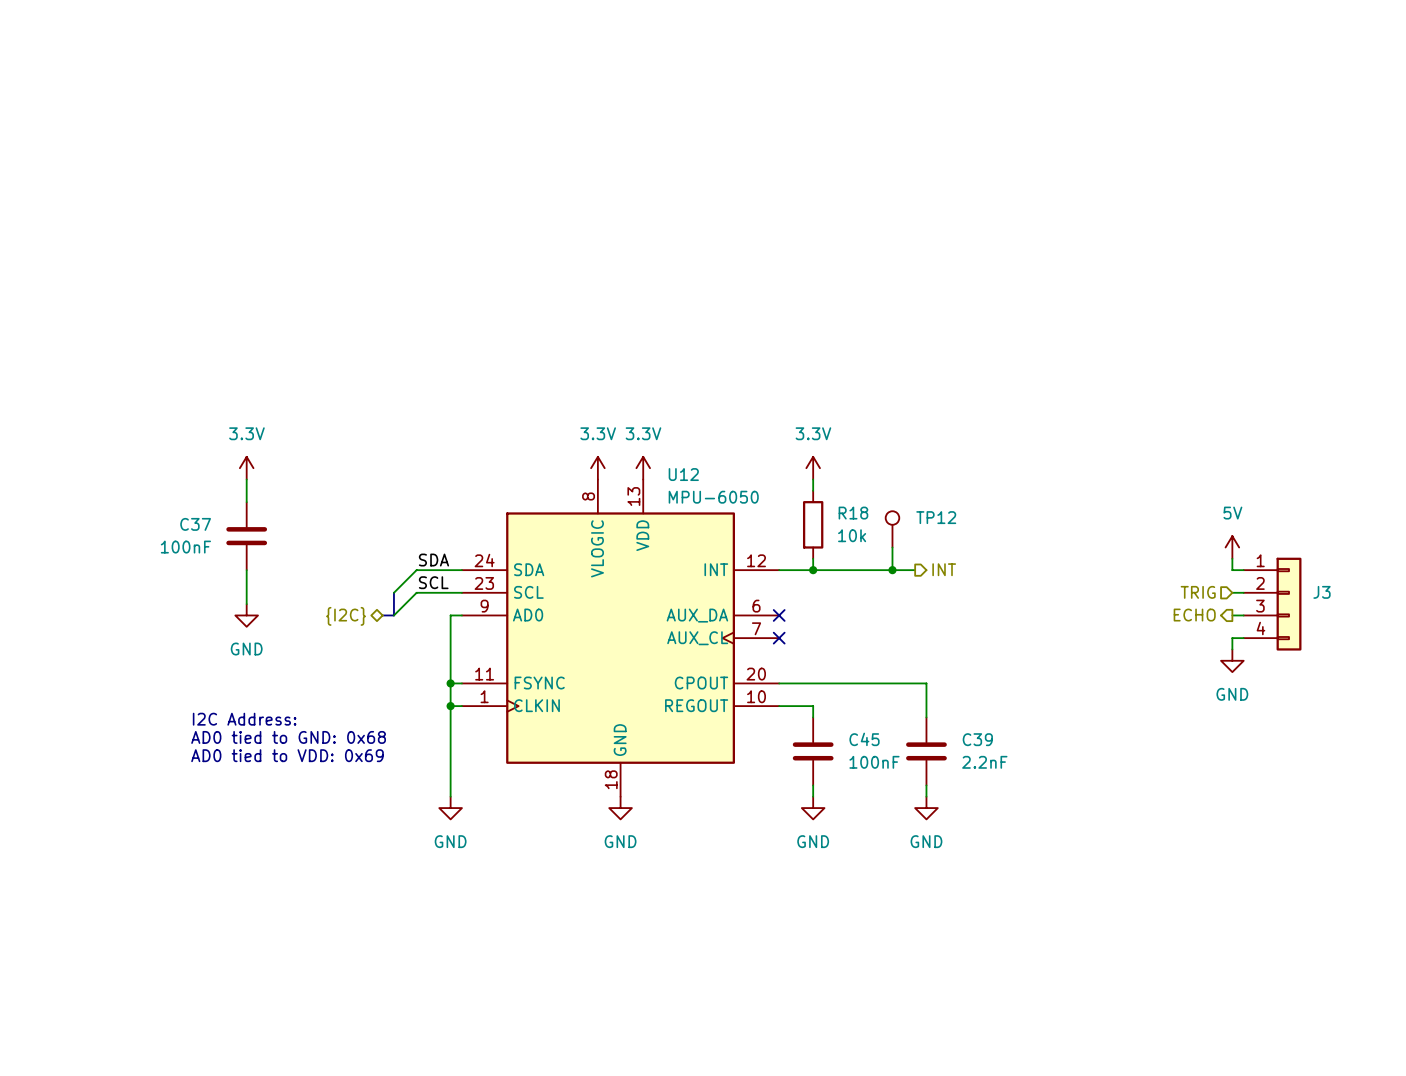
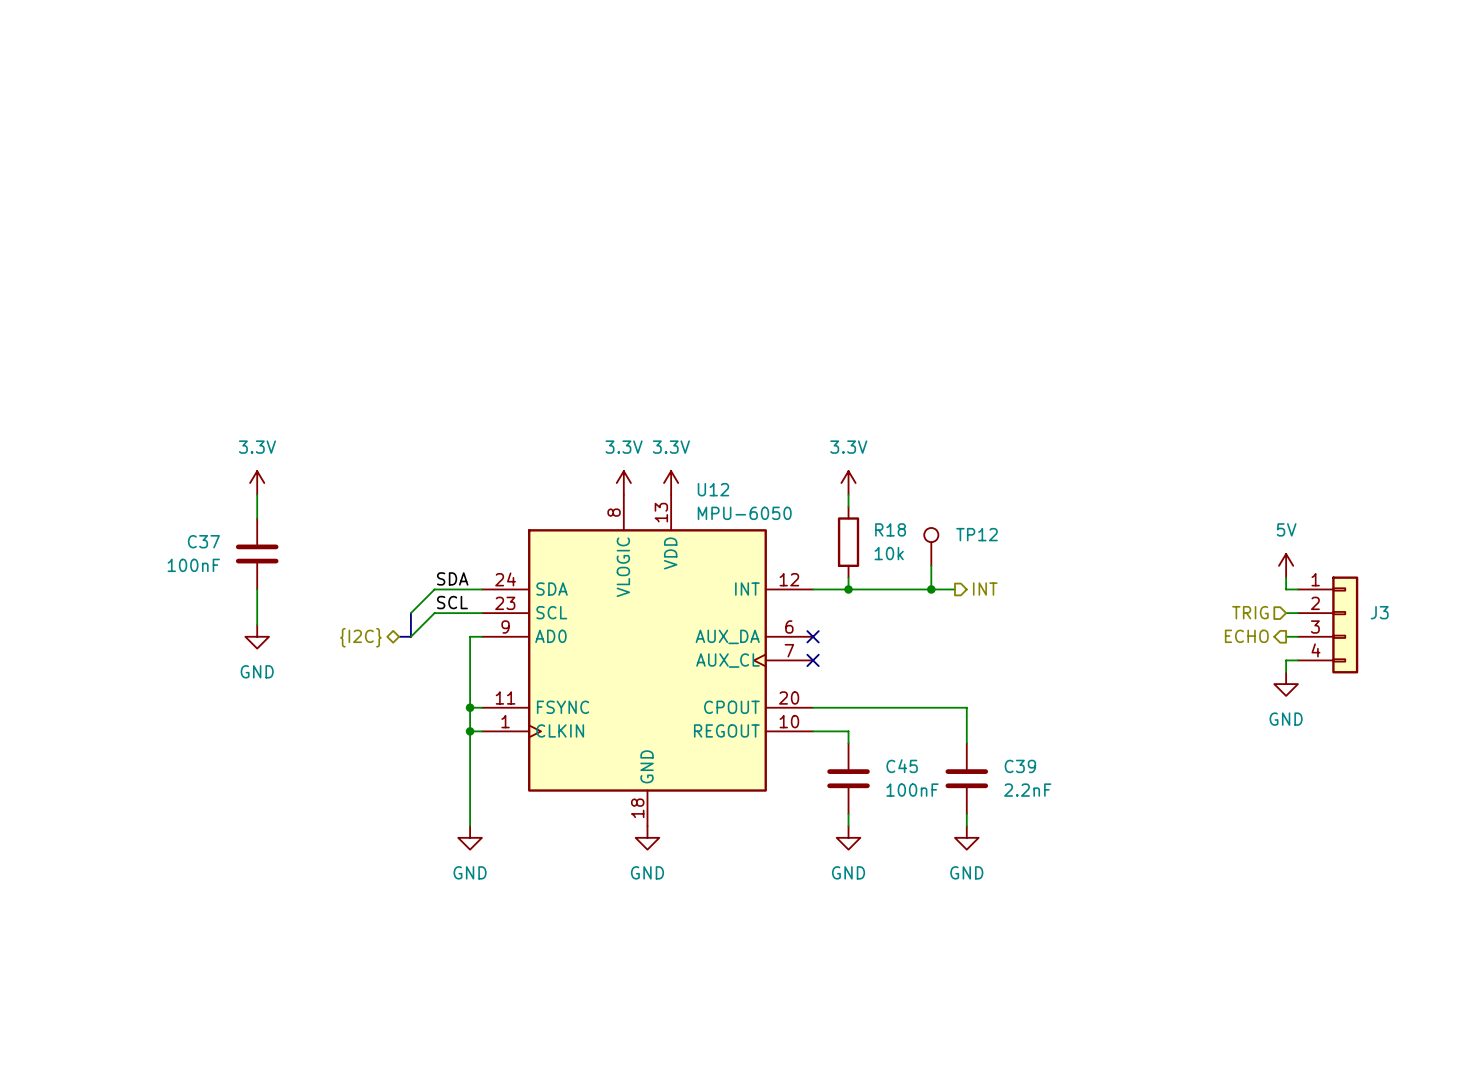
text: I2C Address: (244, 719) -> none
text: AD0 tied to GND: 0x68 (288, 737) -> none
text: AD0 tied to VDD: 0x69 (287, 755) -> none

